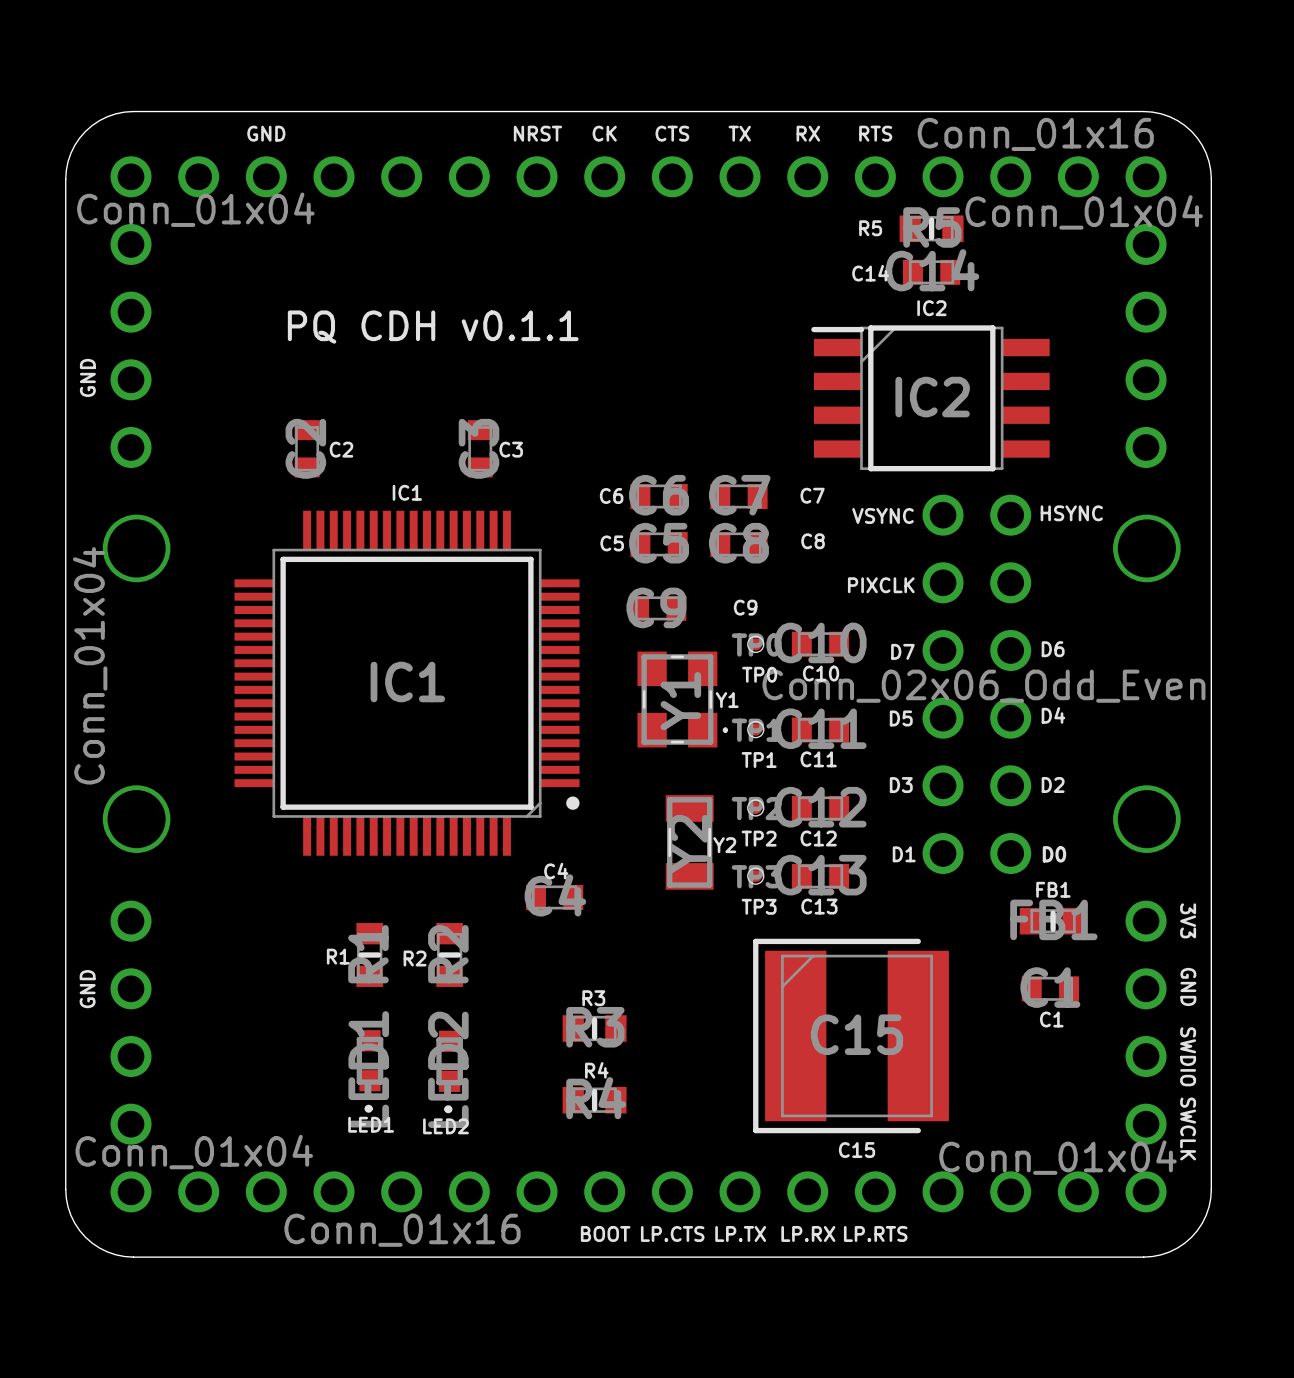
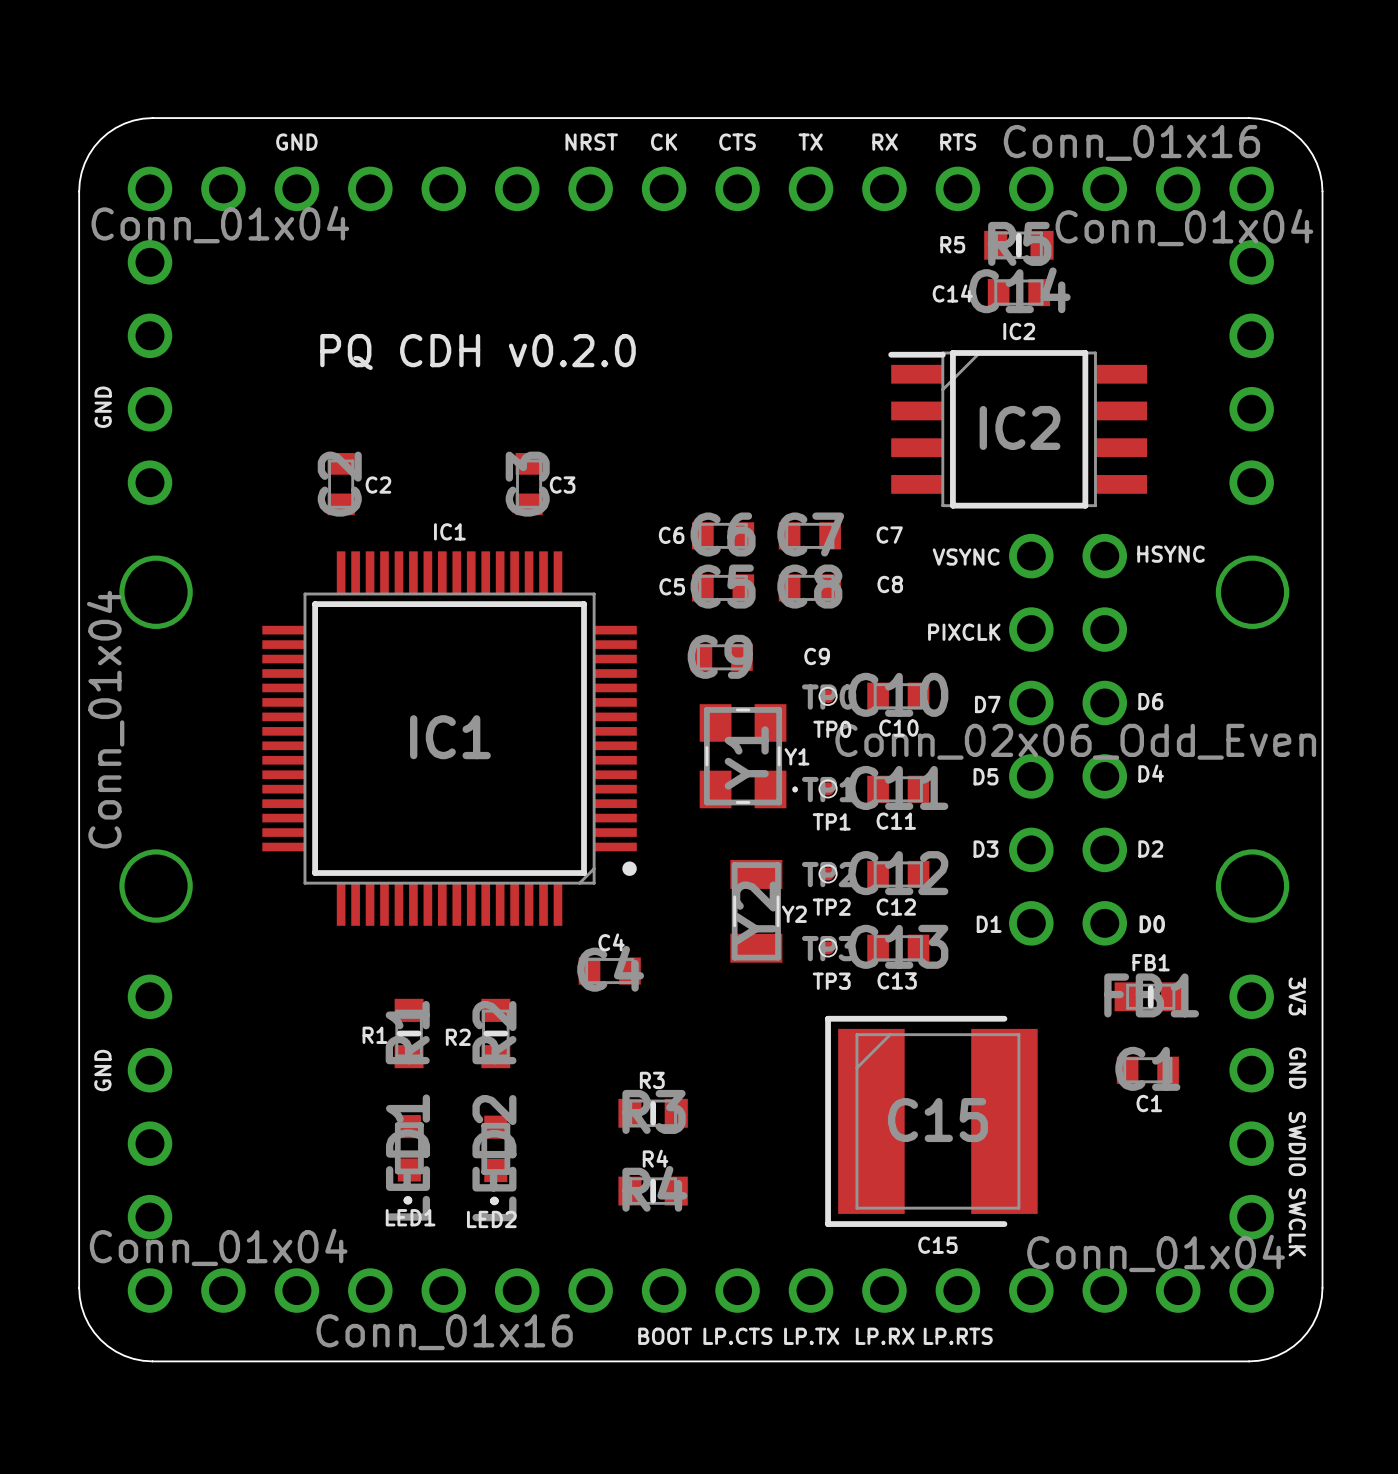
text: PQ CDH v0.1.1 (433, 327) -> PQ CDH v0.2.0 (478, 351)

